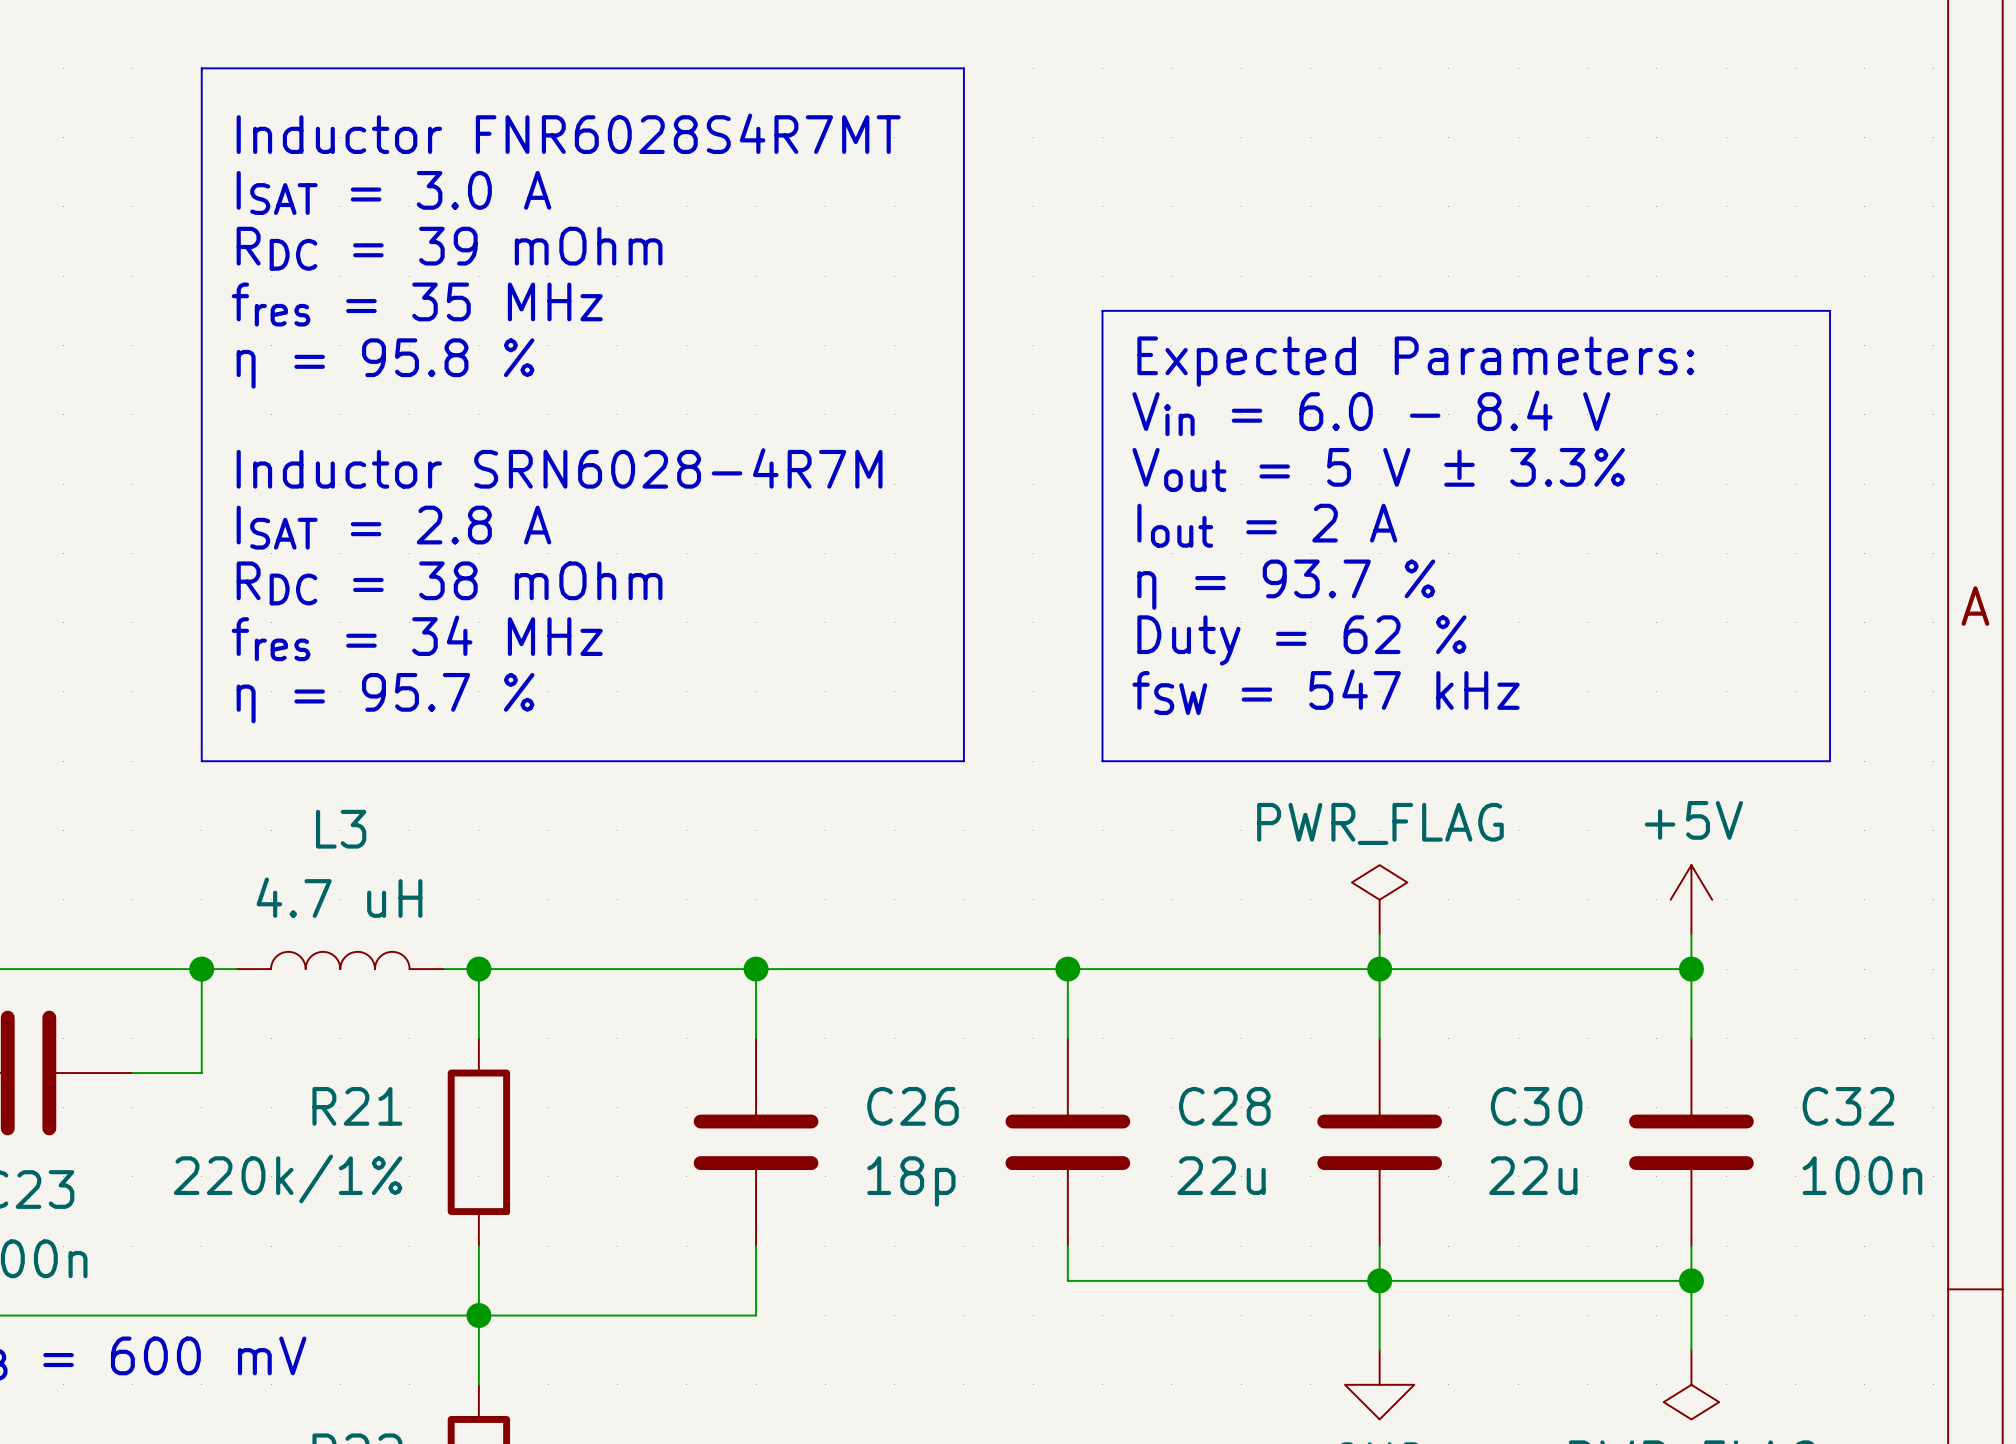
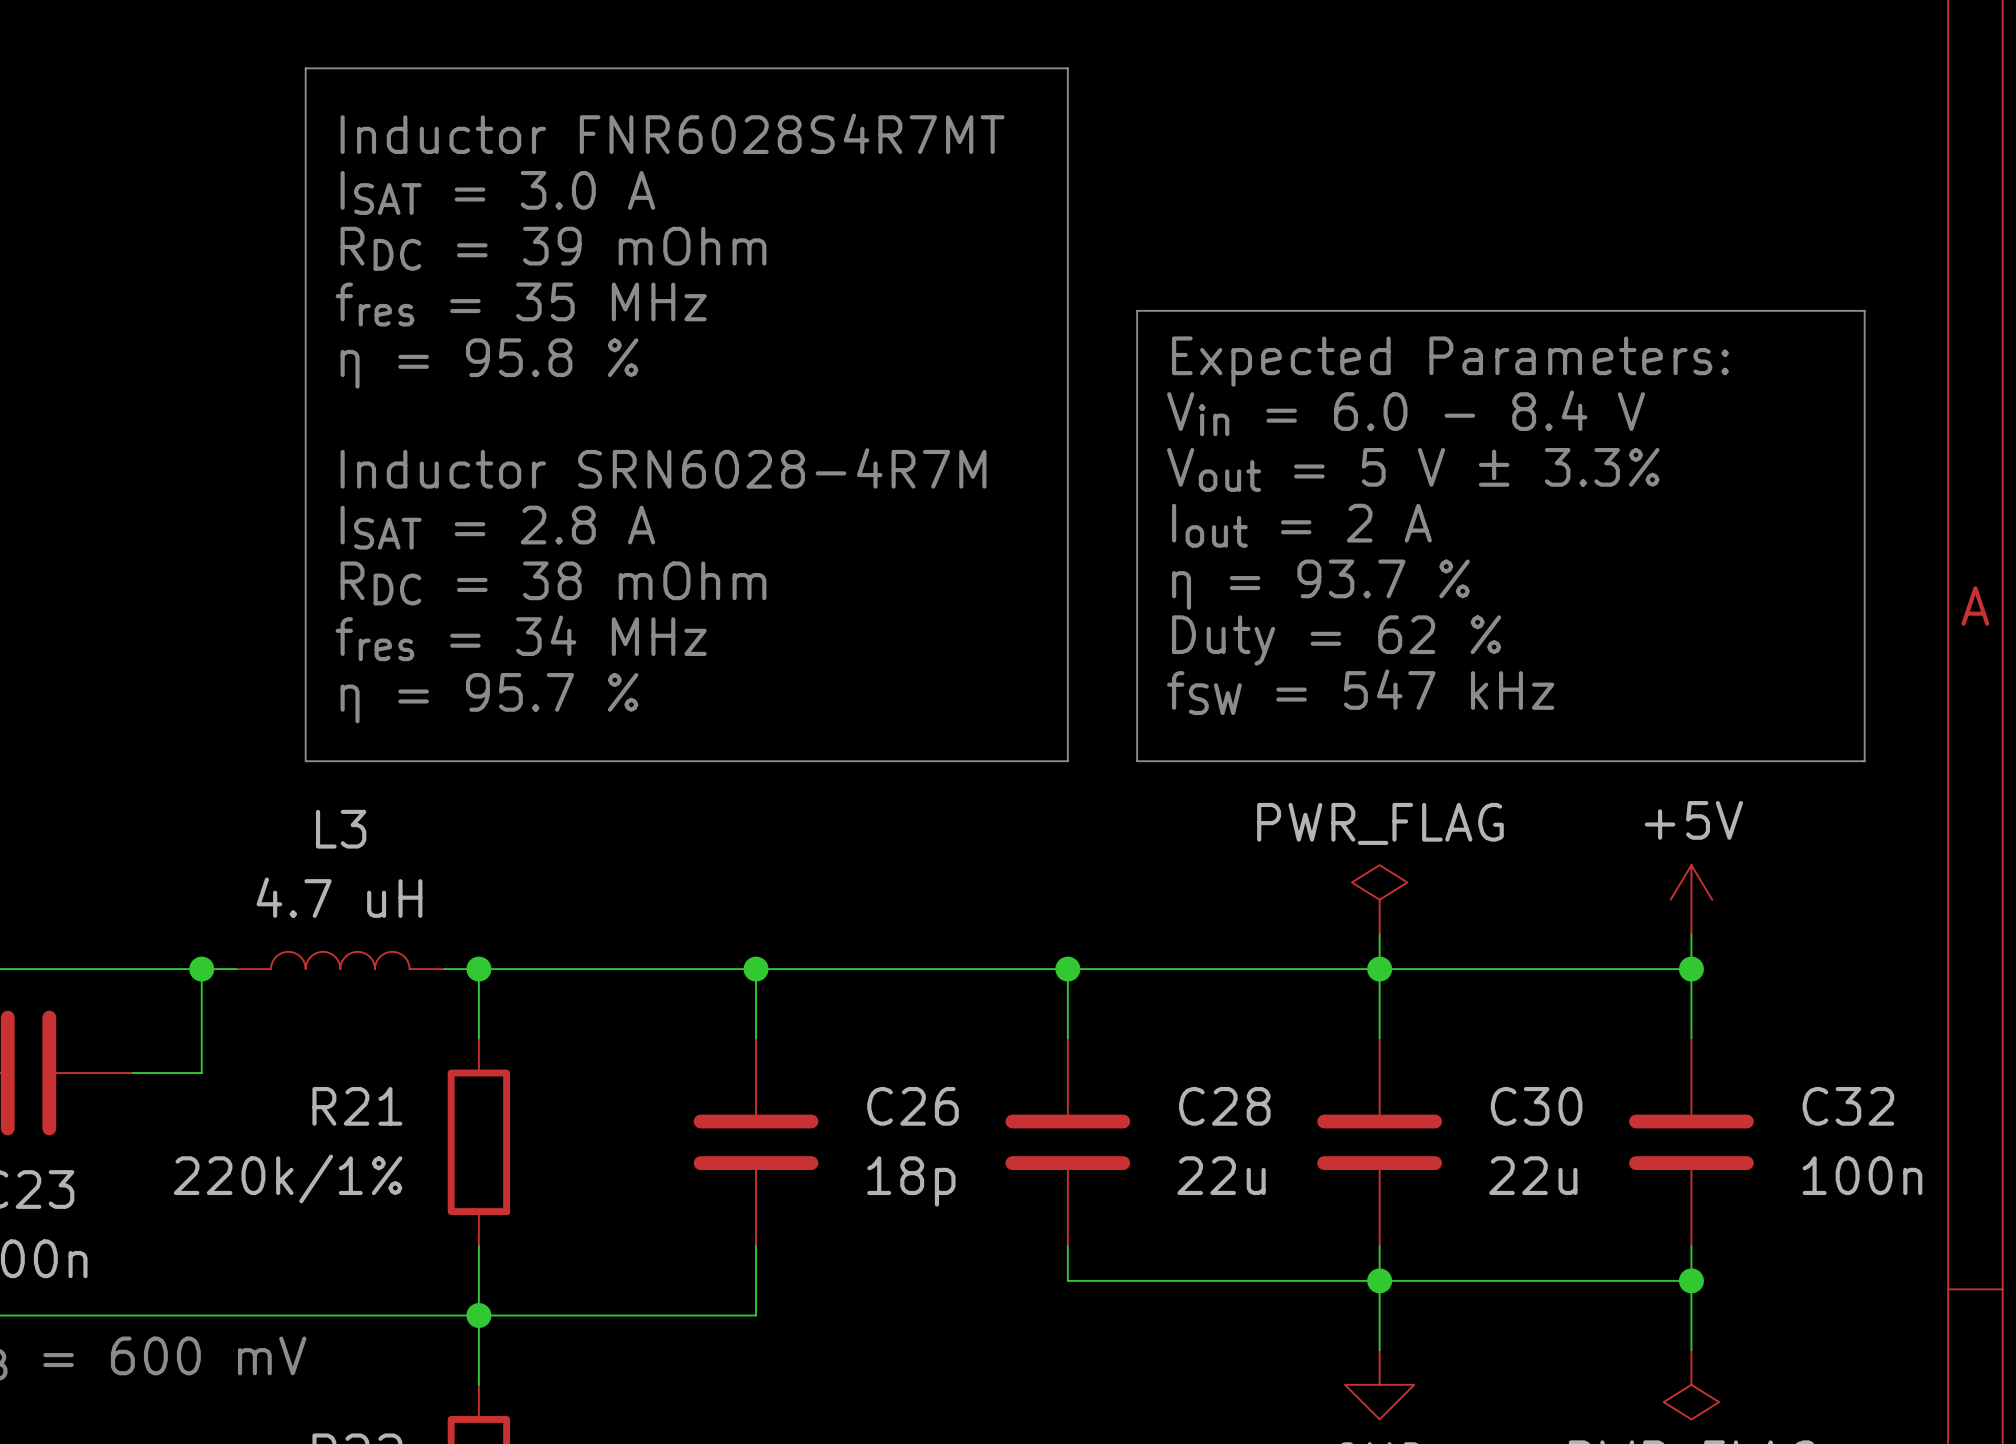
line: (305, 68) (201, 68) (201, 761) (305, 761) -> (305, 68) (305, 761)
line: (963, 68) (963, 761) -> (963, 68) (1067, 68) (1067, 761) (963, 761)
text position: Inductor FNR6028S4R7MT (568, 133) -> Inductor FNR6028S4R7MT (672, 133)
text position: ISAT = 3.0 A (393, 192) -> ISAT = 3.0 A (497, 192)
text position: RDC = 39 mOhm (449, 248) -> RDC = 39 mOhm (553, 248)
text position: fres = 35 MHz (417, 304) -> fres = 35 MHz (521, 304)
line: (1137, 310) (1102, 310) (1102, 761) (1137, 761) -> (1137, 310) (1137, 761)
line: (1830, 310) (1830, 761) -> (1830, 310) (1864, 310) (1864, 761) (1830, 761)
text position: Expected Parameters: (1415, 361) -> Expected Parameters: (1450, 361)
text position: η = 95.8 % (385, 363) -> η = 95.8 % (489, 363)
text position: Vin = 6.0 - 8.4 V (1371, 413) -> Vin = 6.0 - 8.4 V (1406, 413)
text position: Inductor SRN6028-4R7M (559, 468) -> Inductor SRN6028-4R7M (663, 468)
text position: Vout = 5 V ± 3.3% (1378, 469) -> Vout = 5 V ± 3.3% (1413, 469)
text position: Iout = 2 A (1267, 525) -> Iout = 2 A (1301, 525)
text position: ISAT = 2.8 A (393, 527) -> ISAT = 2.8 A (497, 527)
text position: RDC = 38 mOhm (449, 583) -> RDC = 38 mOhm (553, 583)
text position: η = 93.7 % (1286, 584) -> η = 93.7 % (1320, 584)
text position: fres = 34 MHz (417, 638) -> fres = 34 MHz (521, 638)
text position: Duty = 62 % (1301, 640) -> Duty = 62 % (1336, 640)
text position: fSW = 547 kHz (1326, 692) -> fSW = 547 kHz (1360, 692)
text position: η = 95.7 % (385, 698) -> η = 95.7 % (489, 698)

